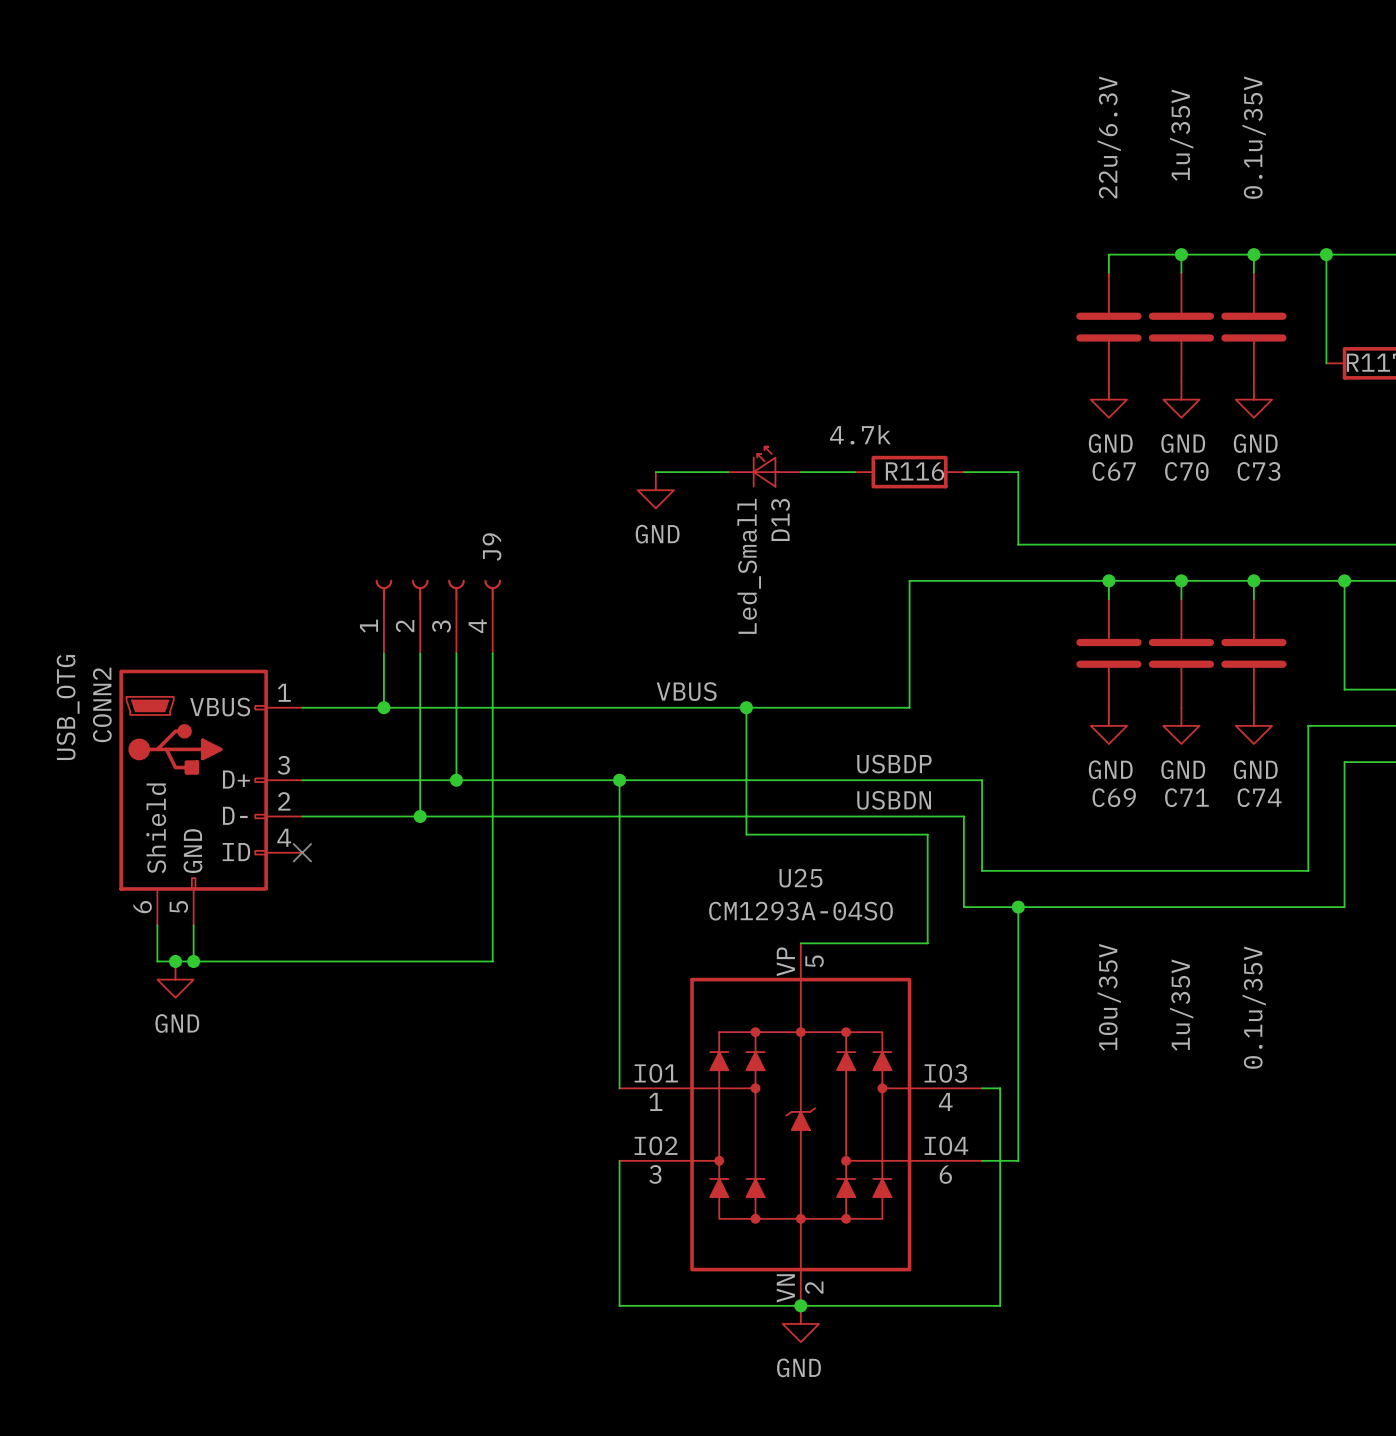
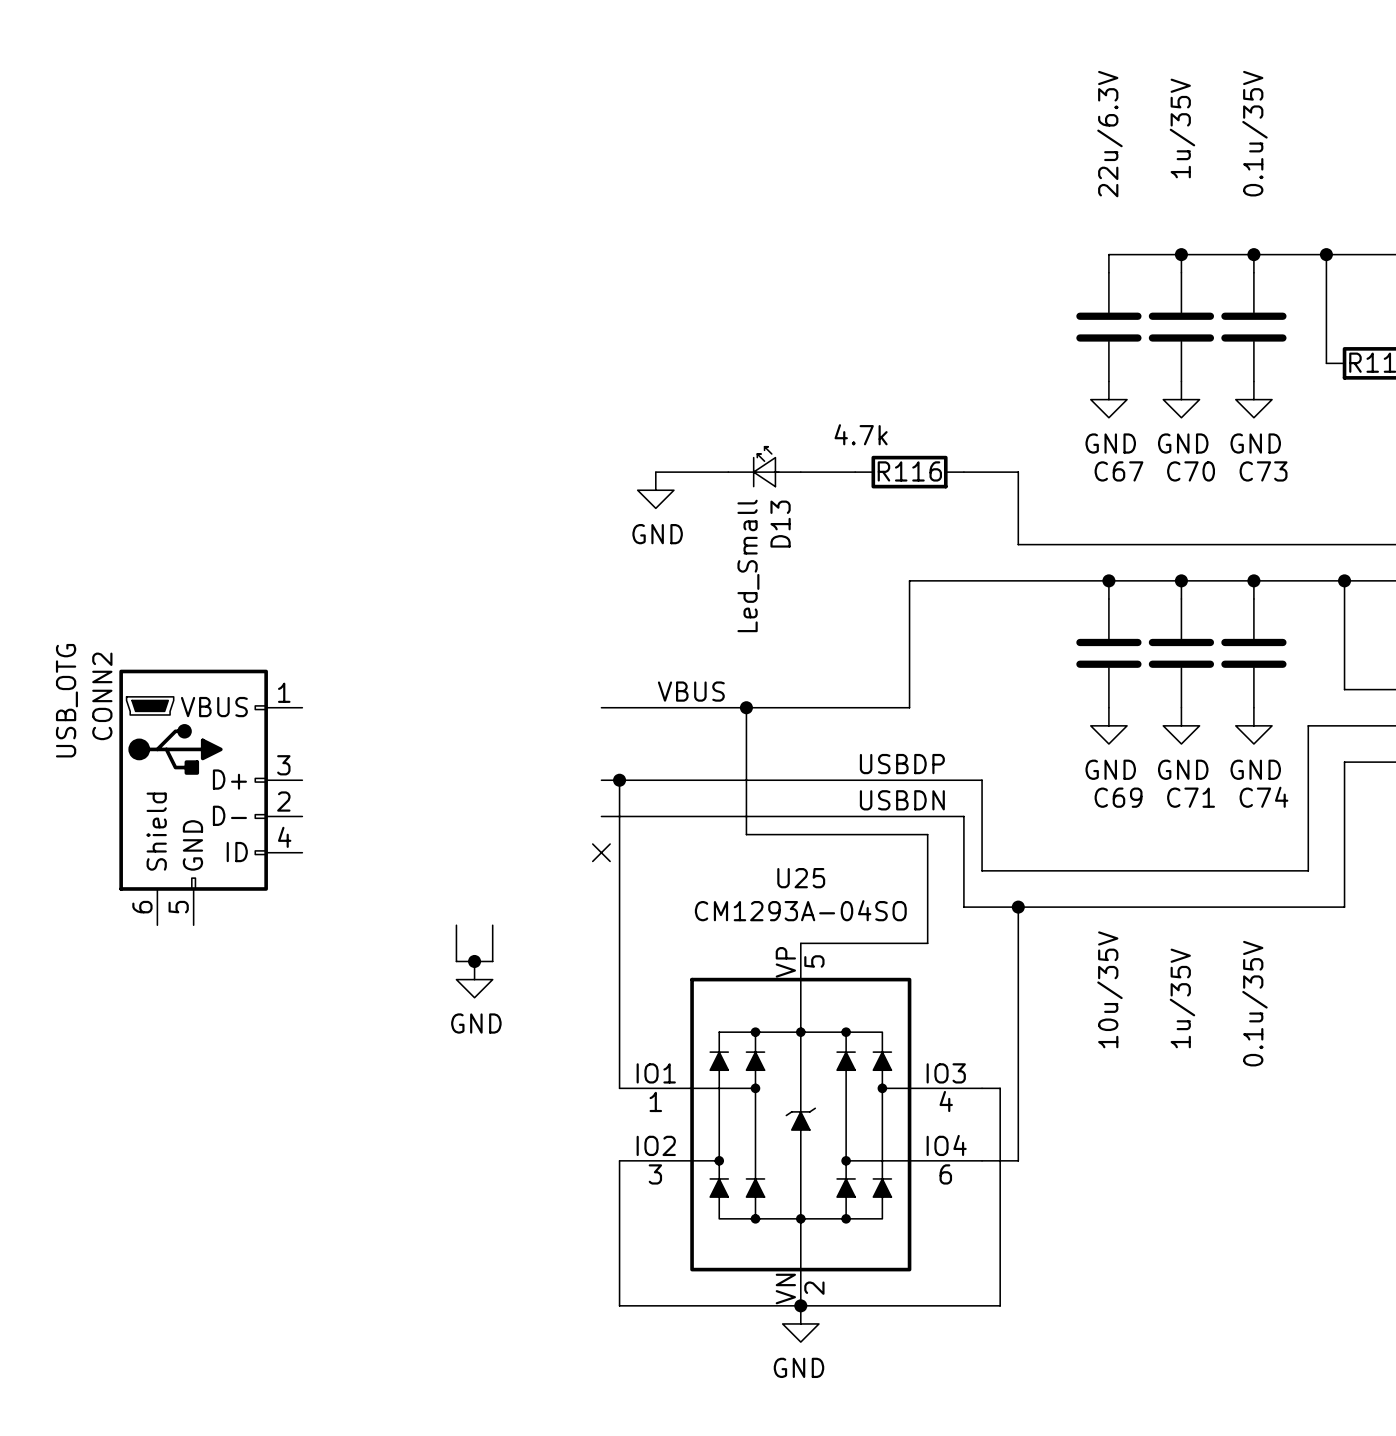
J9: (438, 616) -> none
wire: (383, 653) (383, 707) -> none
wire: (420, 653) (420, 816) -> none
wire: (456, 653) (456, 780) -> none
wire: (492, 653) (492, 925) -> none
wire: (302, 707) (601, 707) -> none
junction: (383, 707) -> none
wire: (302, 780) (601, 780) -> none
junction: (456, 780) -> none
wire: (302, 816) (601, 816) -> none
junction: (420, 816) -> none
no-connect mark: (302, 852) -> none
no-connect mark: none -> (601, 852)
wire: (157, 925) (157, 961) (456, 961) -> (456, 925) (456, 961)
wire: (193, 925) (193, 961) -> none
junction: (175, 961) -> none
junction: (193, 961) -> none
junction: none -> (474, 961)
power symbol position: GND (175, 979) -> GND (474, 979)

